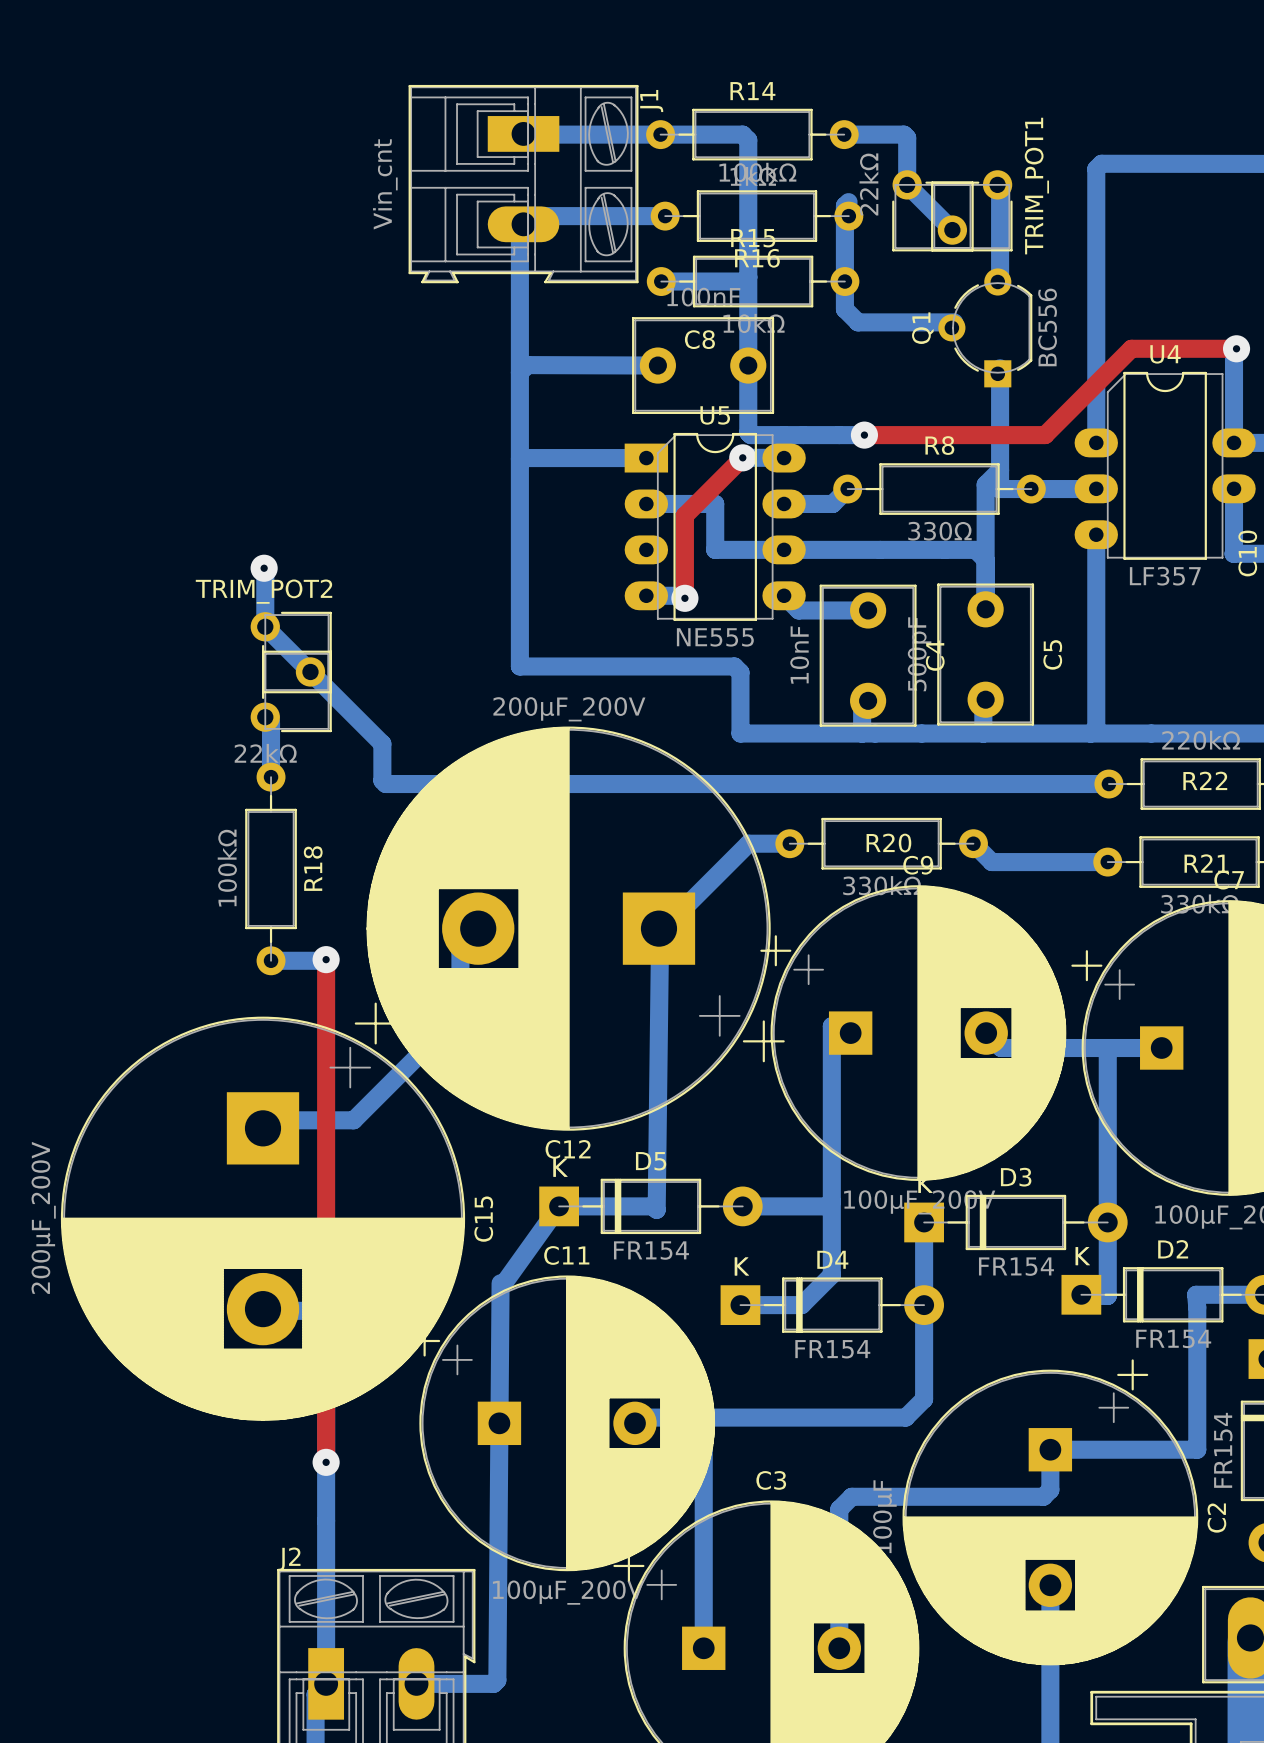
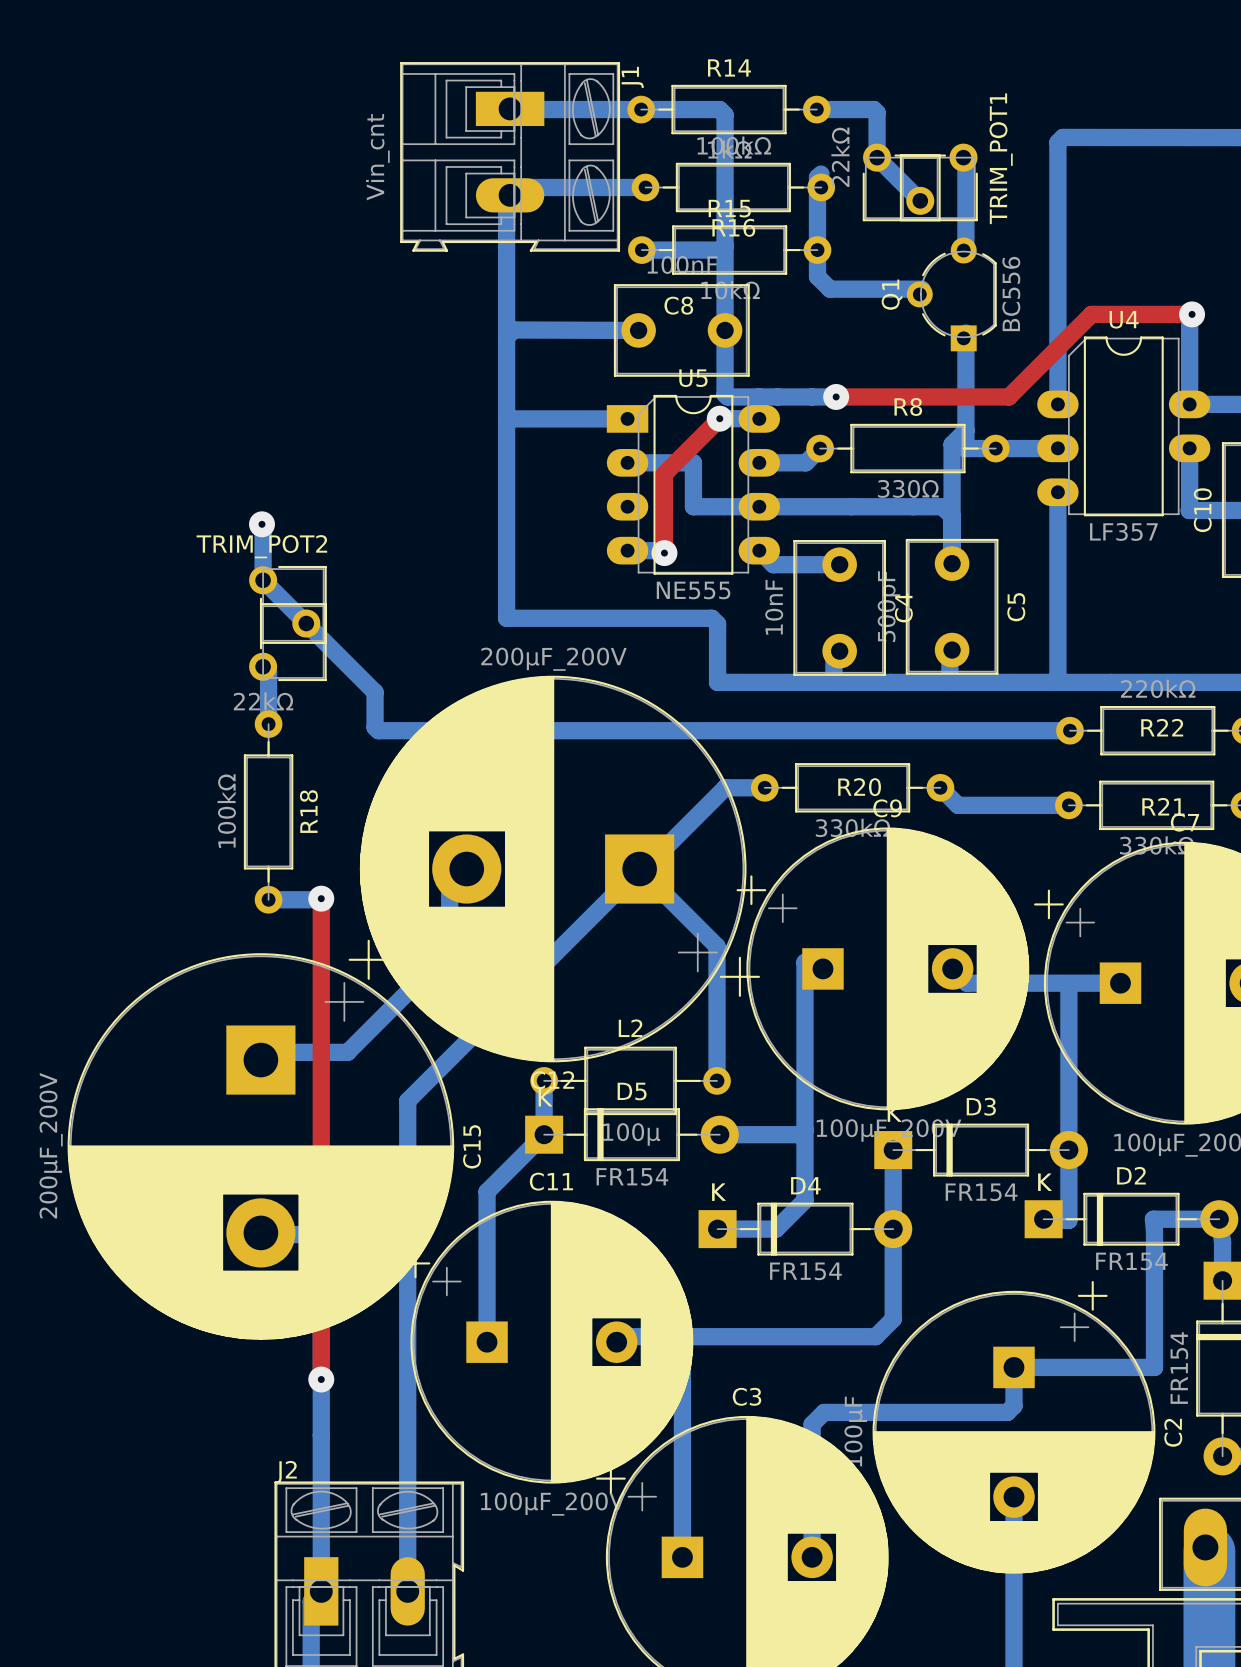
bottom track: (660, 932) (656, 1209) (653, 1206) (559, 1206) (504, 1283) -> none
bottom track: none -> (544, 1080) (544, 1134) (487, 1191) (487, 1342)
L2: none -> 100µ (630, 1080)
bottom track: (500, 1283) (497, 1680) (493, 1683) (416, 1683) -> (717, 1080) (717, 946) (639, 869) (407, 1100) (407, 1591)

